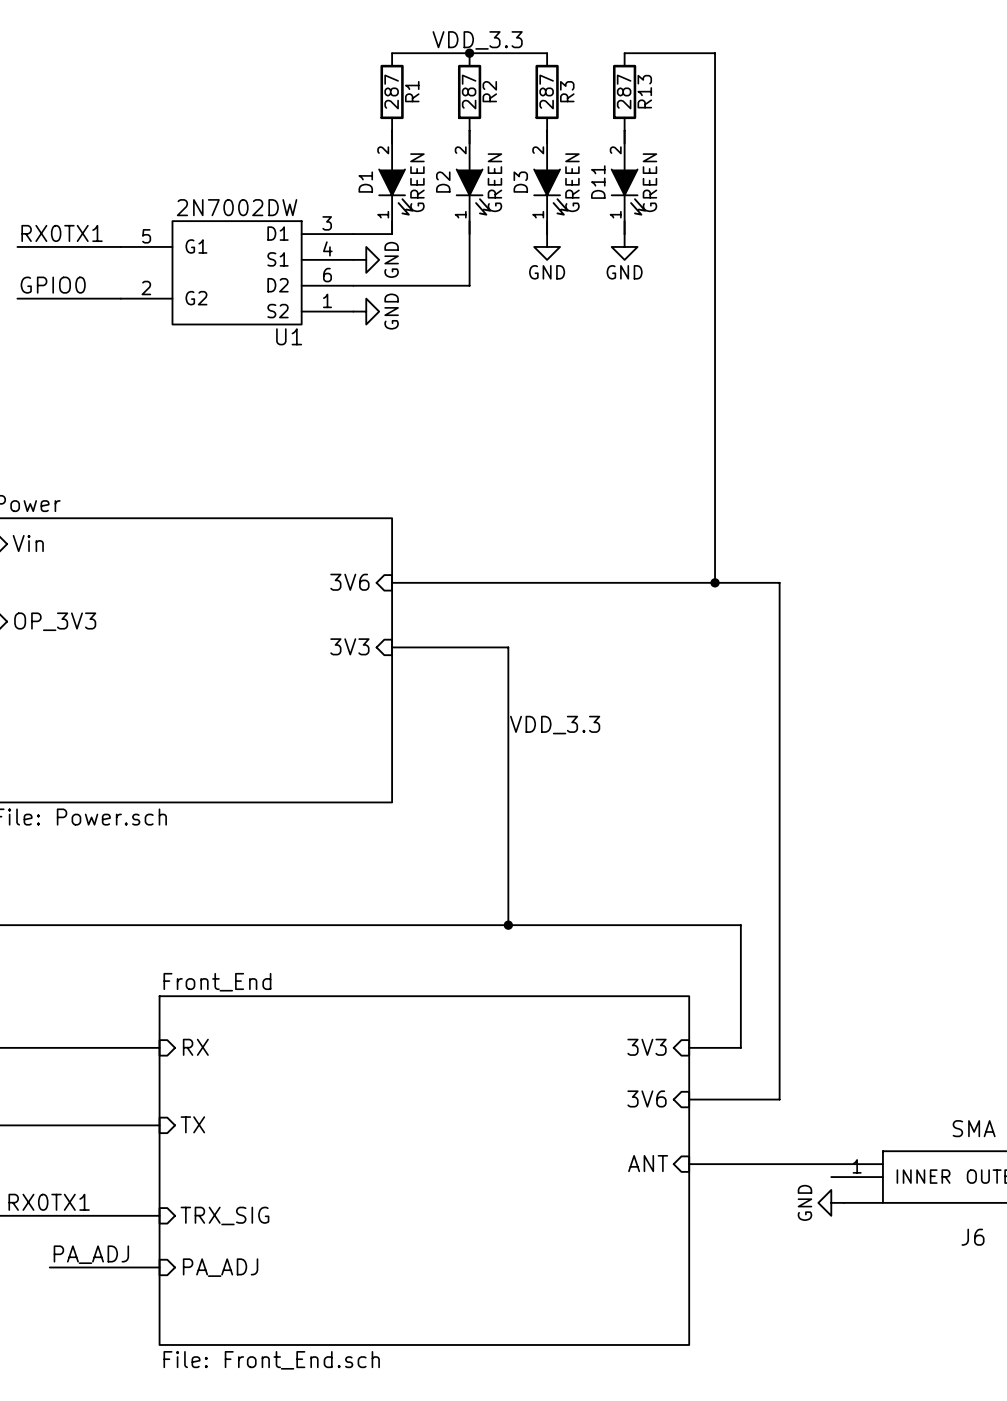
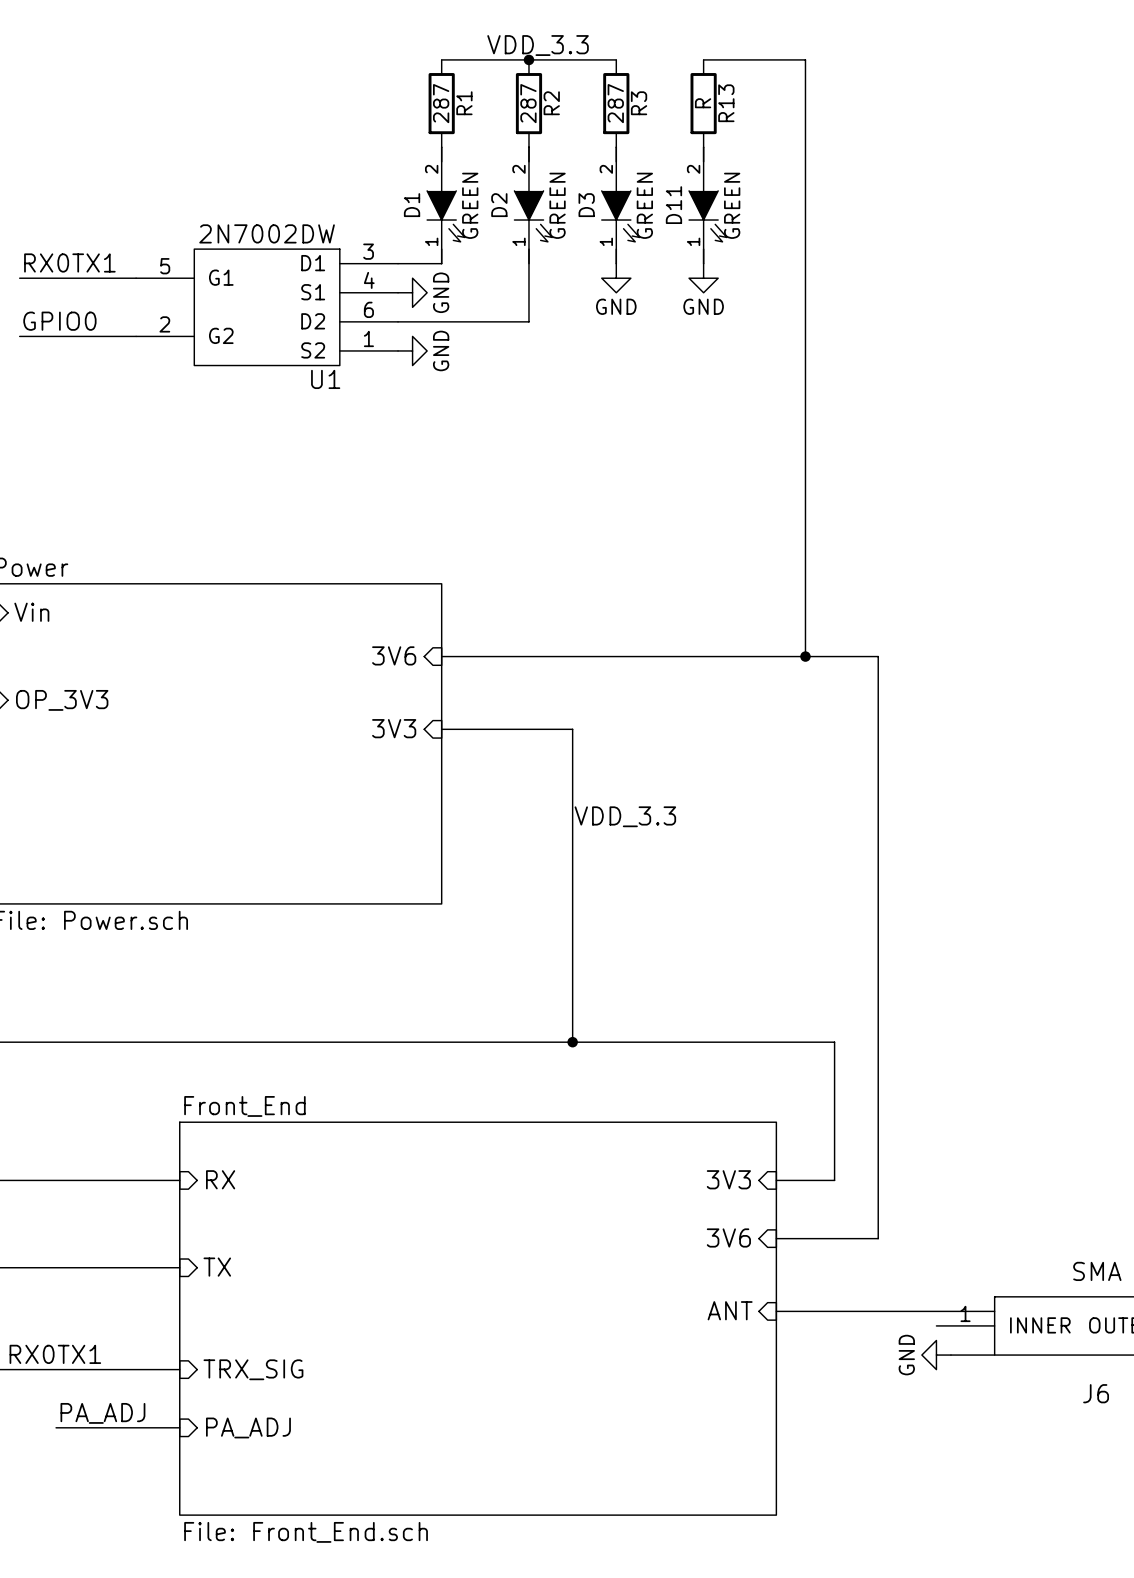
R13 value: 287 (624, 91) -> R (703, 103)

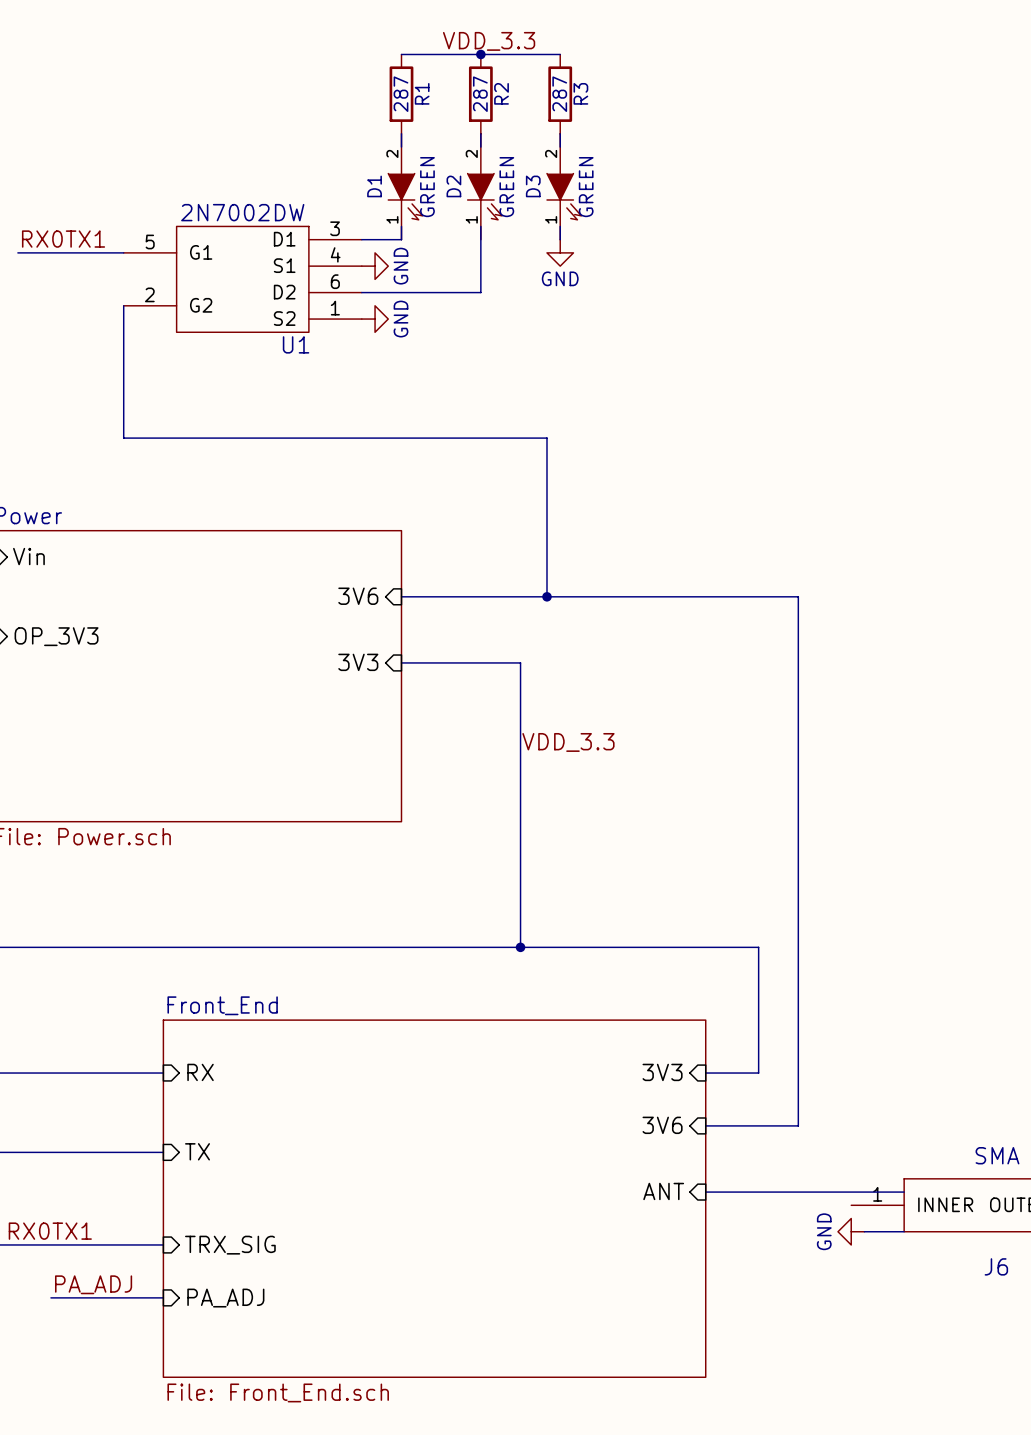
wire: (703, 59) (805, 59) (805, 656) -> none
R13: R (703, 103) -> none
D11: GREEN (707, 205) -> none
power symbol: GND (703, 278) -> none
label: GPIO0 (59, 321) -> none
wire: (19, 336) (136, 336) -> (546, 596) (546, 438) (123, 438) (123, 305)
junction: none -> (546, 596)
junction: (805, 656) -> none

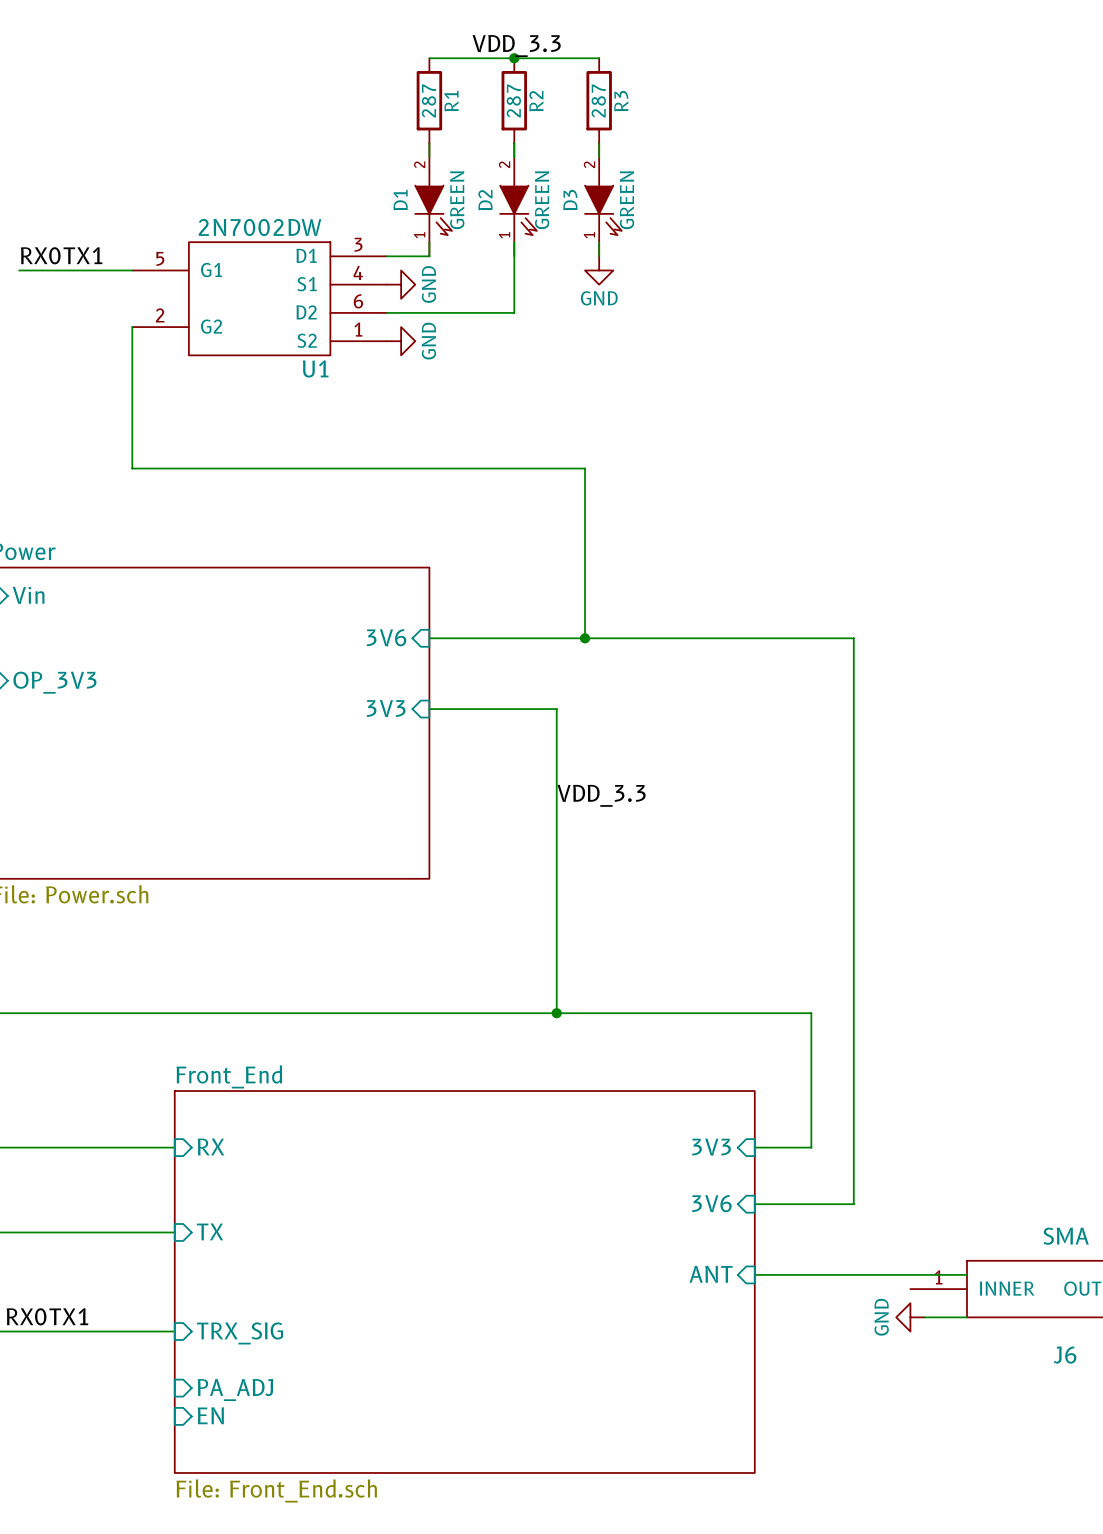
label: PA_ADJ (93, 1284) -> none
wire: (50, 1297) (163, 1297) -> none
sheet pin: none -> EN (210, 1415)

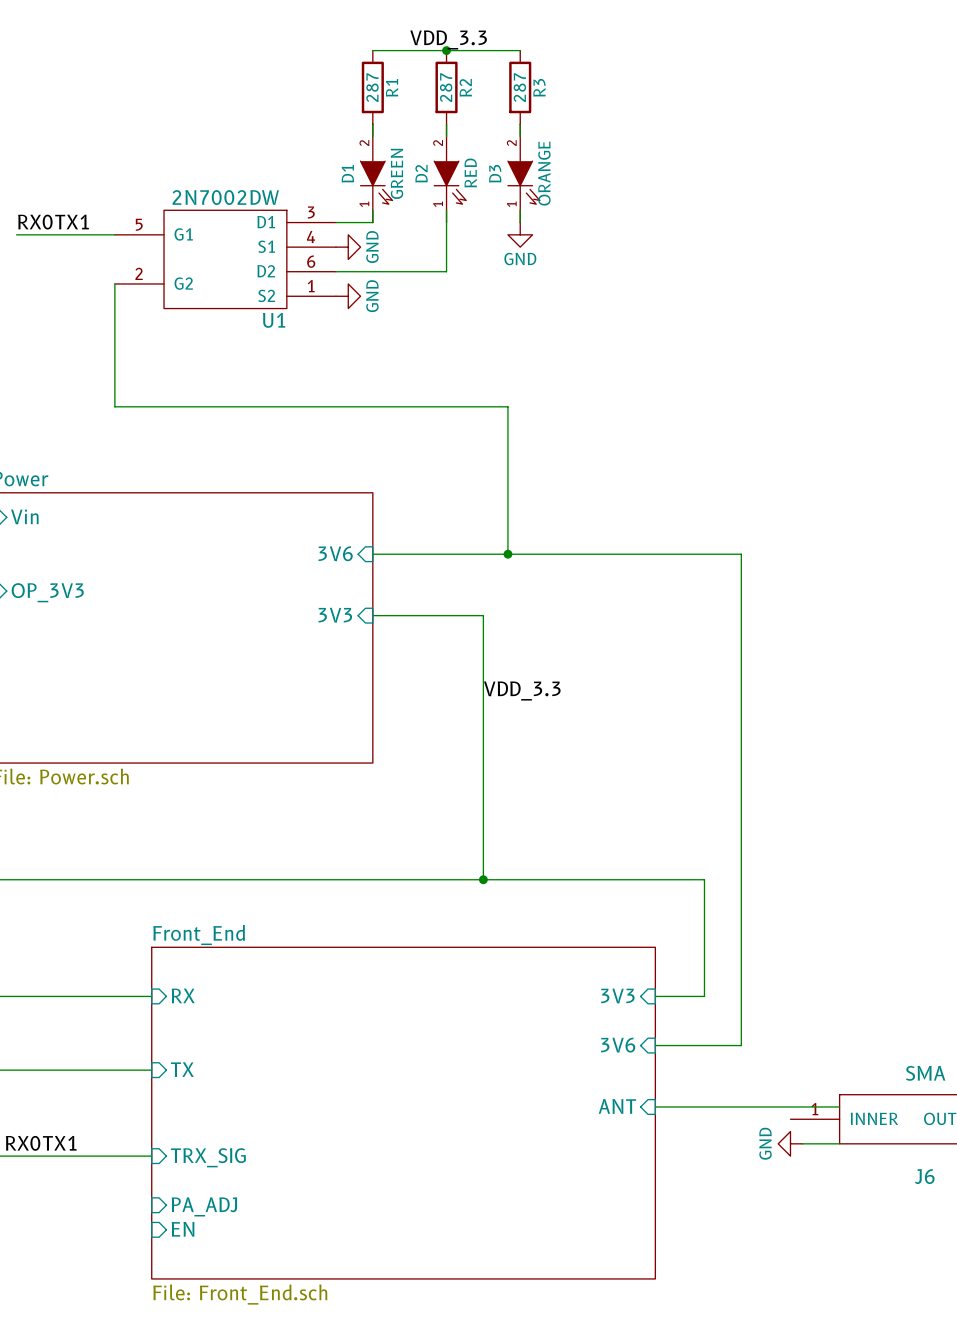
D2 value: GREEN (542, 200) -> RED (470, 173)
D3 value: GREEN (627, 200) -> ORANGE (544, 173)

